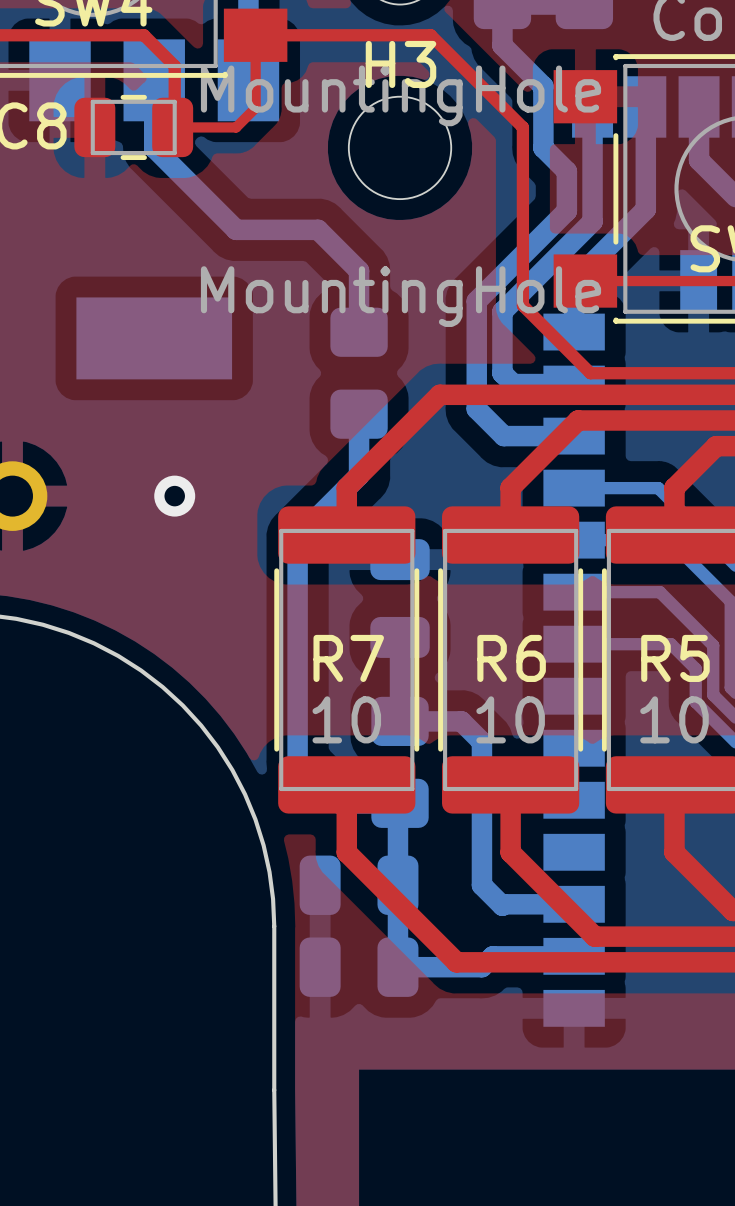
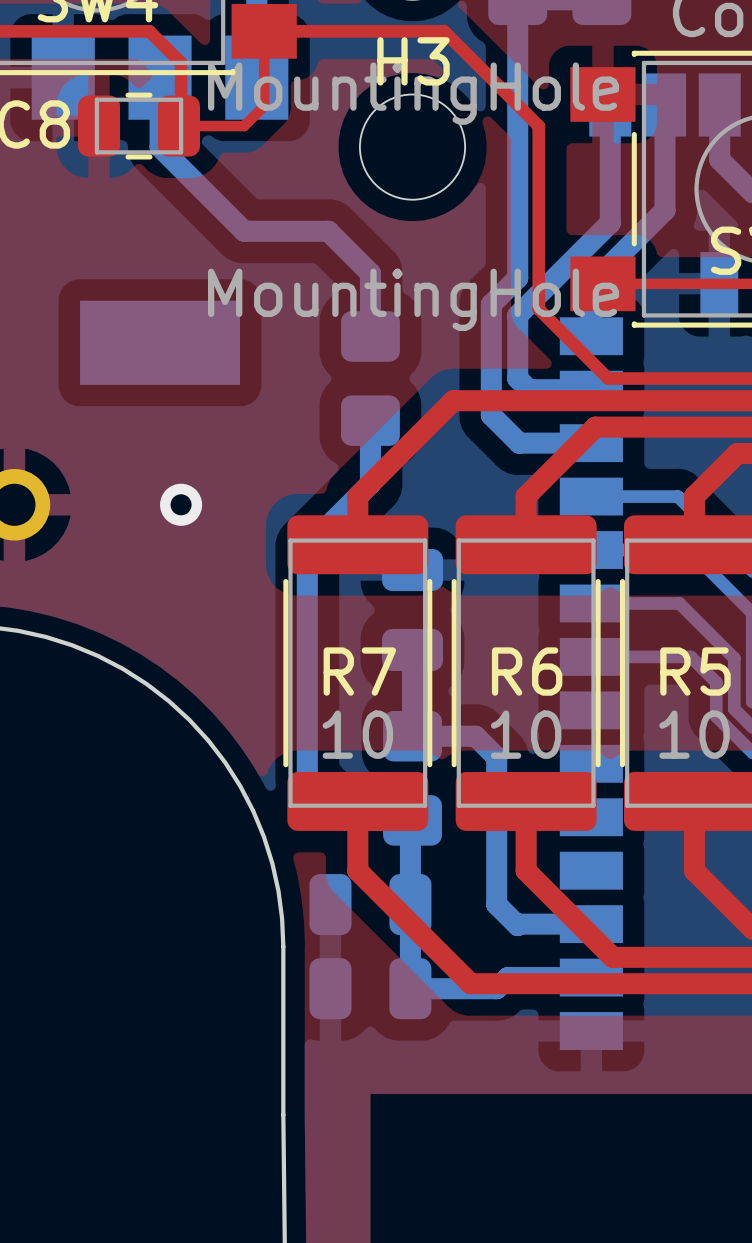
bottom track: (502, 45) (543, 86) (543, 147) (566, 171) (566, 211) (502, 275) -> (517, 41) (517, 278)

